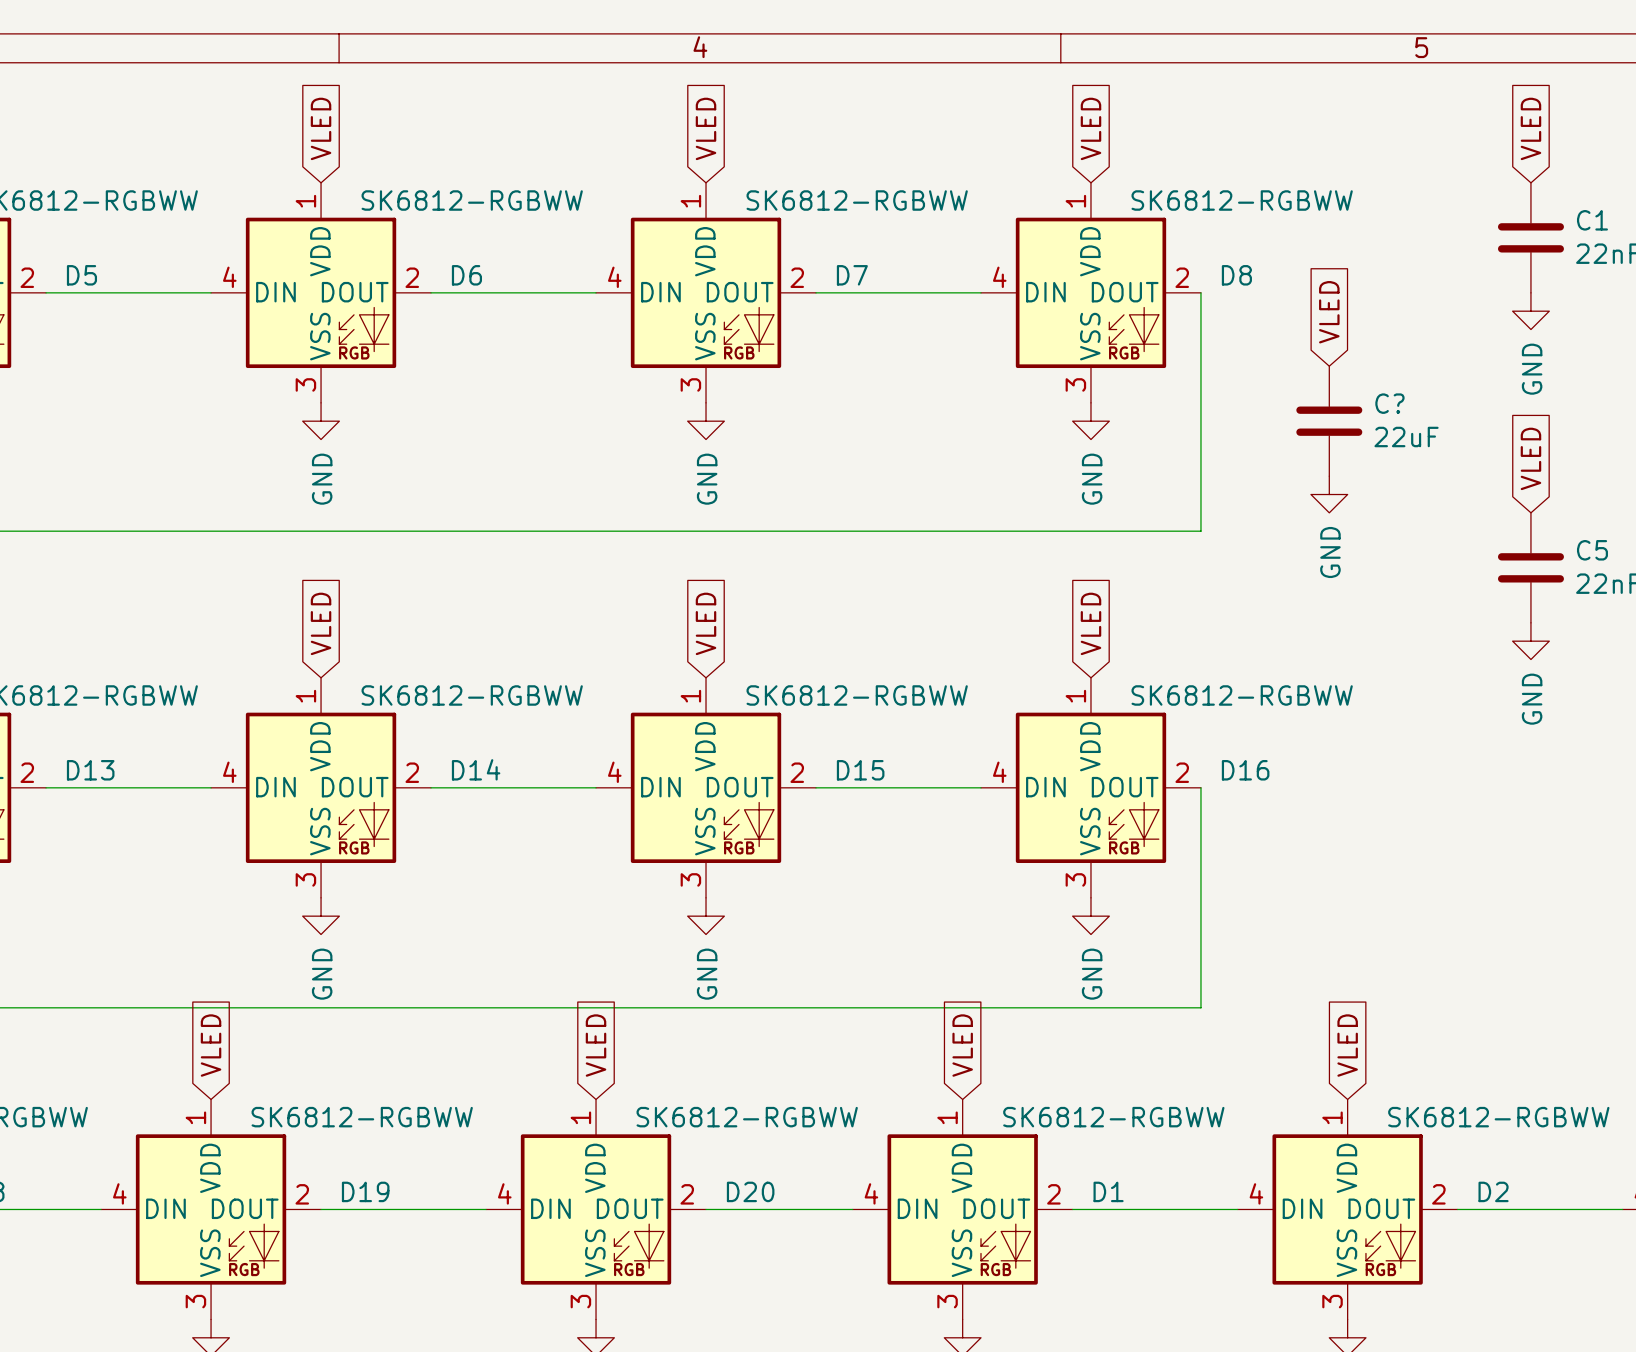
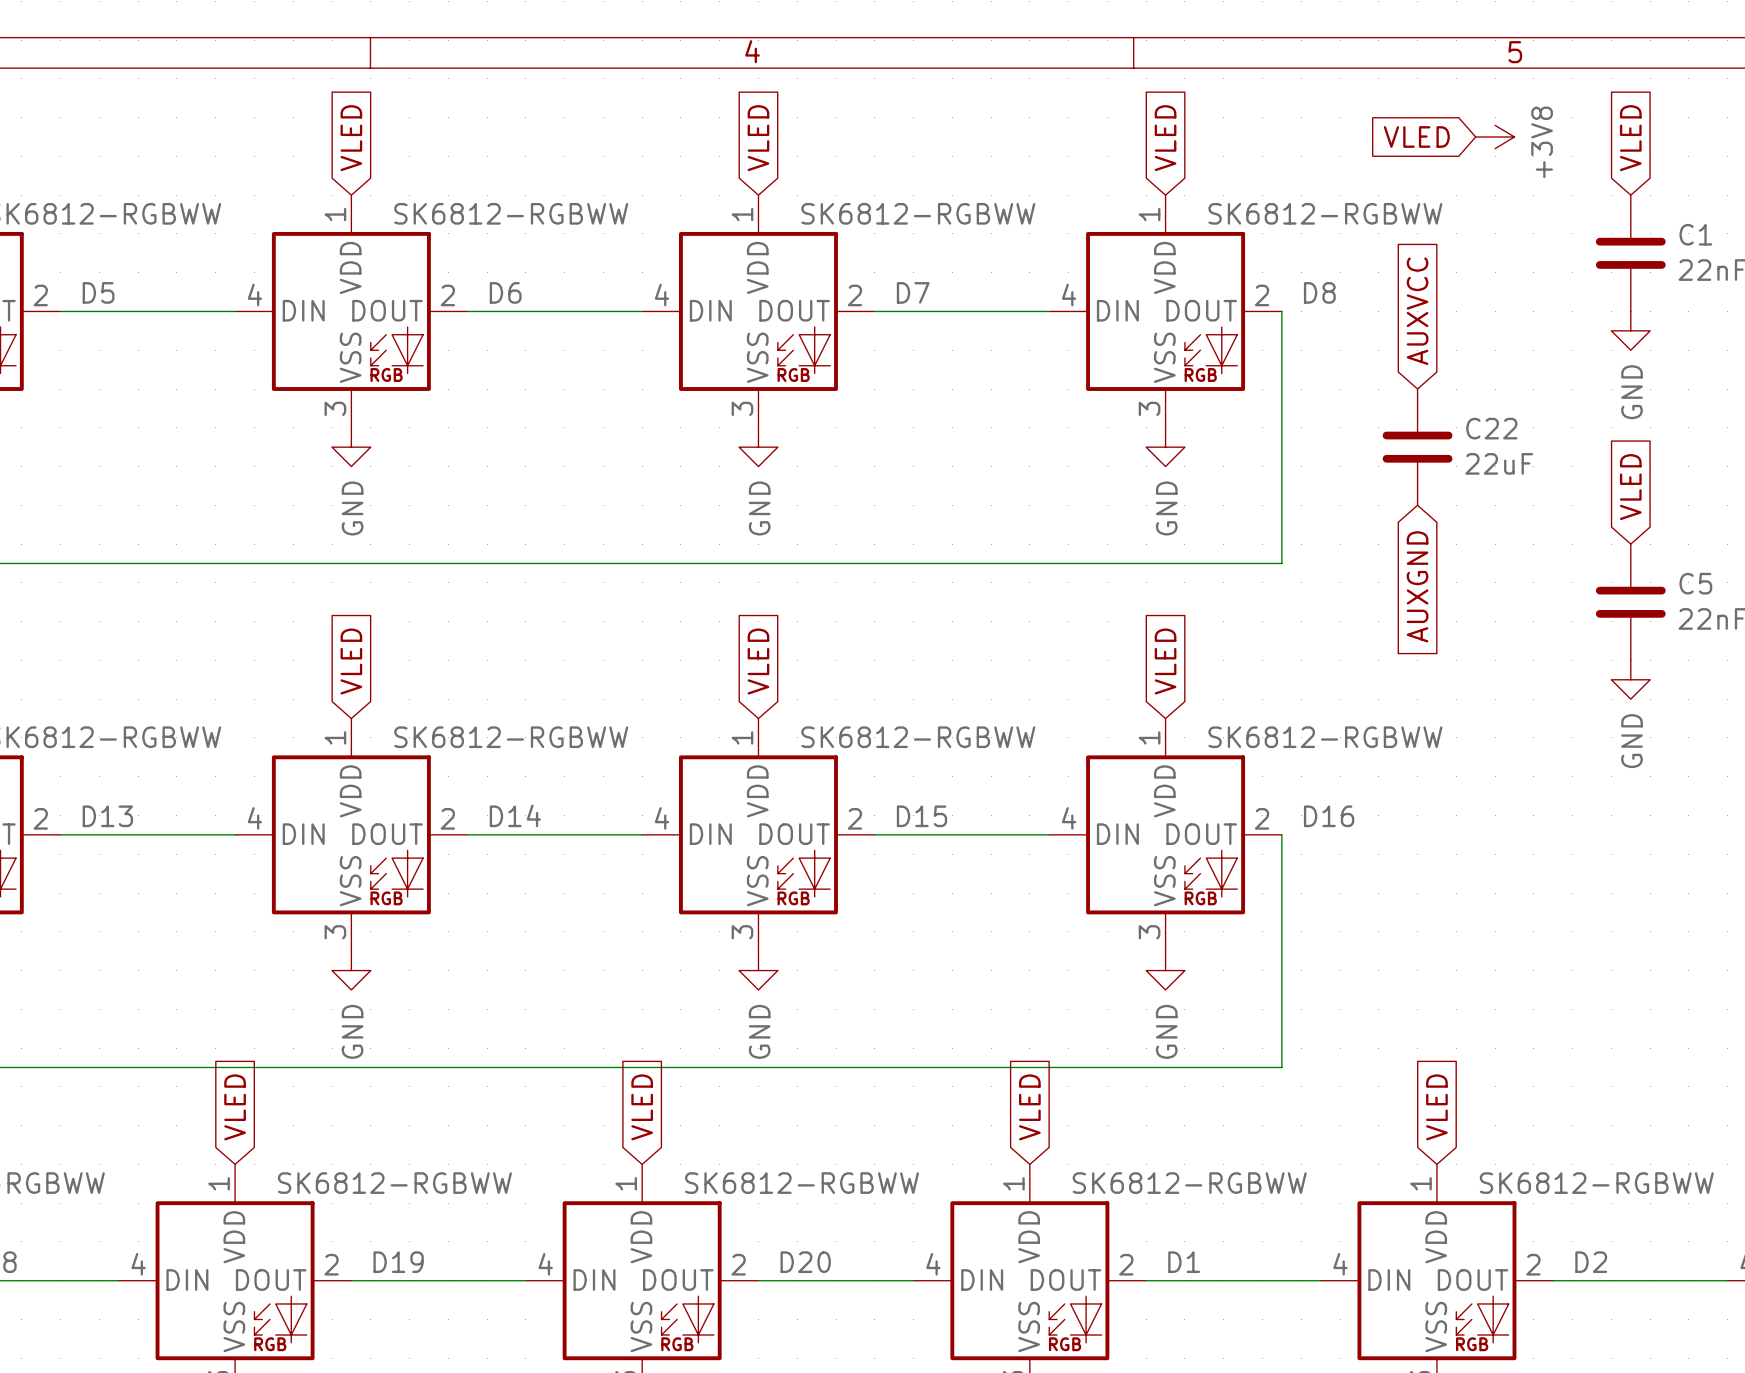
global label: none -> VLED (1416, 137)
power symbol: none -> +3V8 (1495, 137)
global label: VLED (1329, 312) -> AUXVCC (1417, 311)
C? name: C? (1389, 403) -> C22 (1491, 428)
power symbol: GND (1329, 494) -> none
global label: none -> AUXGND (1417, 586)

